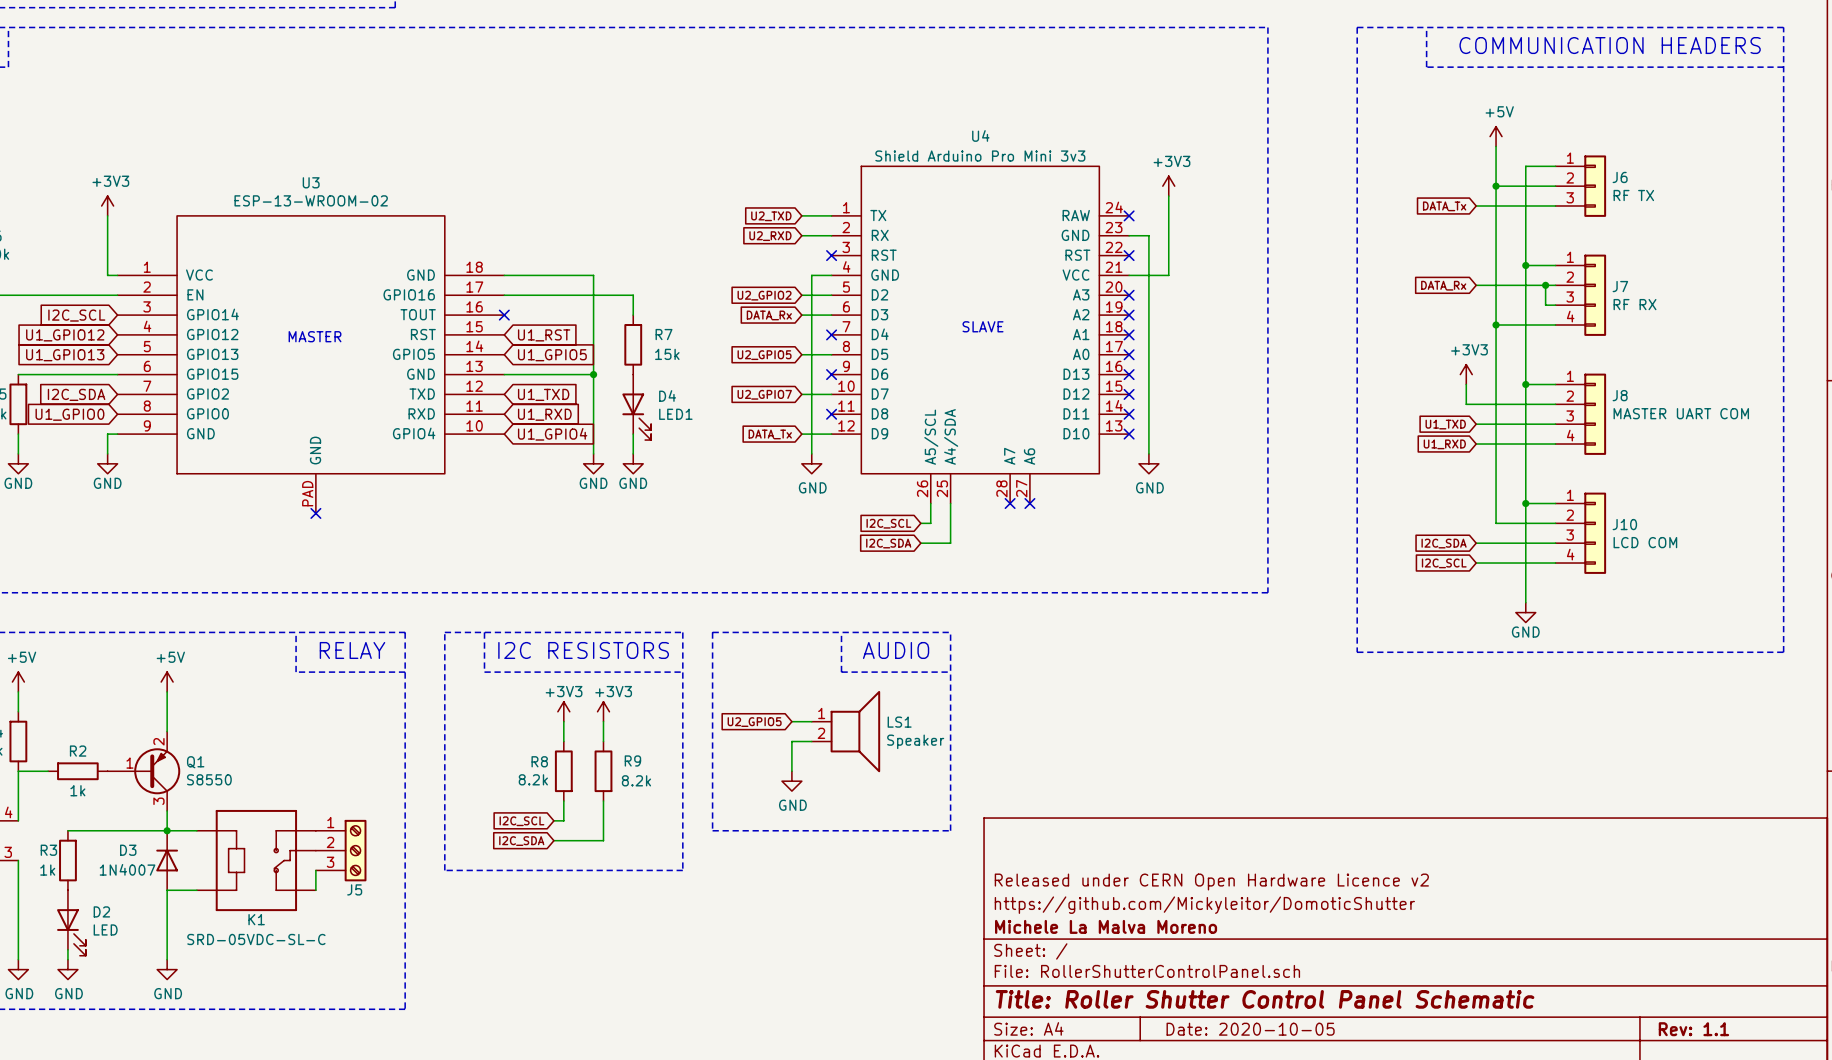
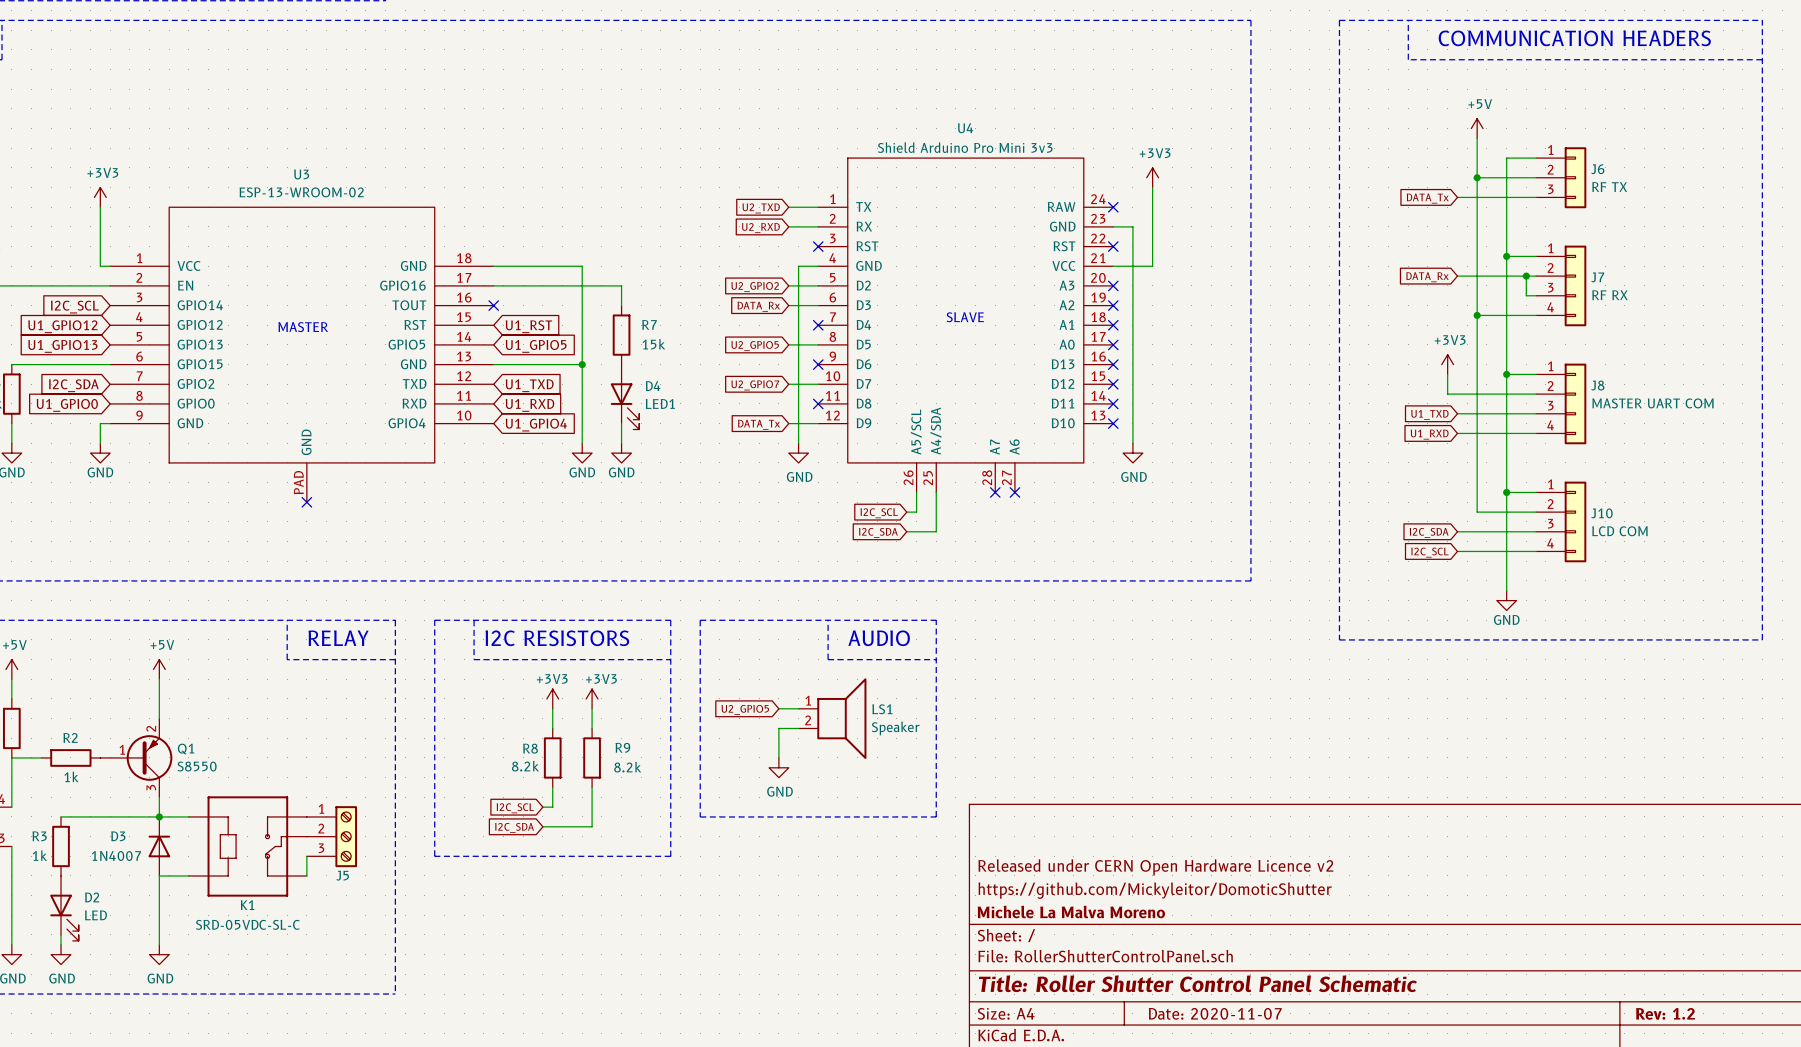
title block: Date: 2020-10-05 (1250, 1029) -> Date: 2020-11-07 (1215, 1013)
title block: Rev: 1.1 (1693, 1029) -> Rev: 1.2 (1665, 1013)

